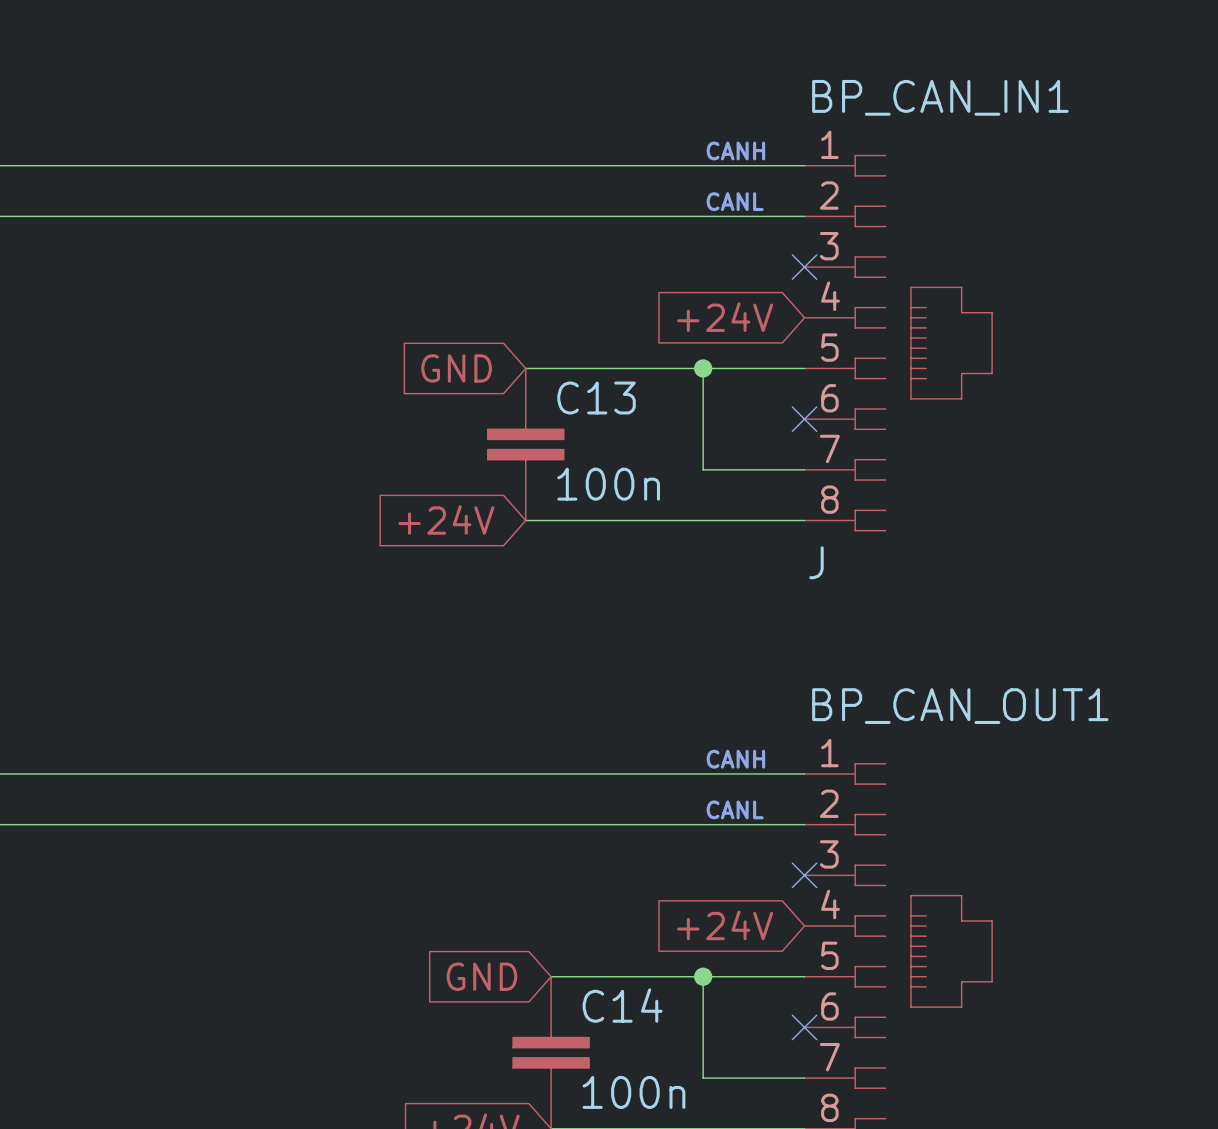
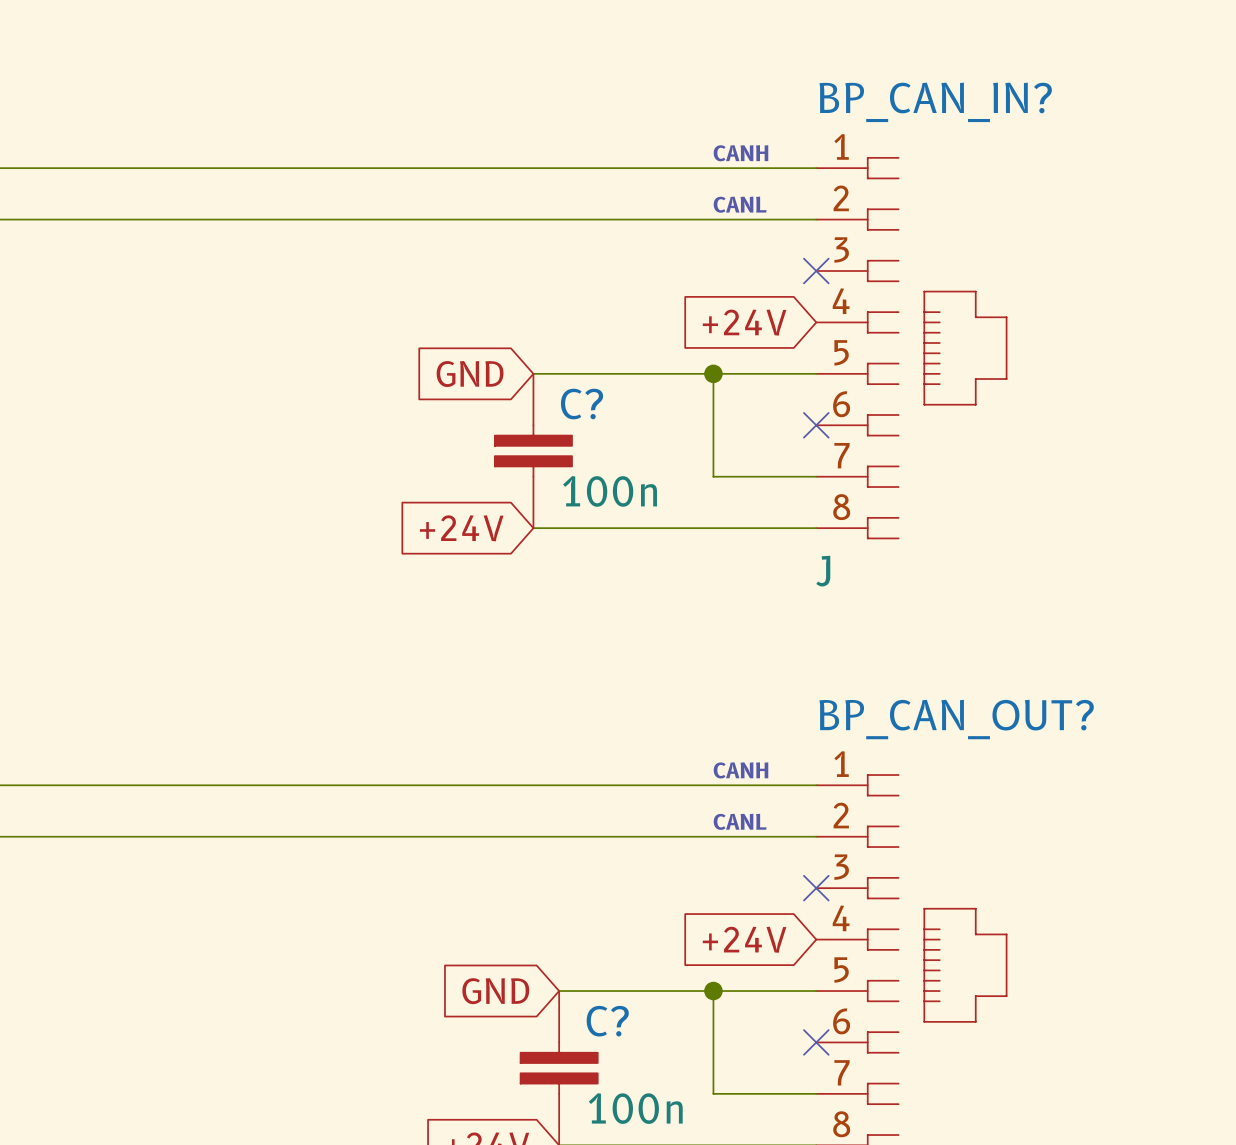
BP_CAN_IN1 name: BP_CAN_IN1 (940, 97) -> BP_CAN_IN? (935, 102)
C13 name: C13 (596, 398) -> C? (582, 404)
BP_CAN_OUT1 name: BP_CAN_OUT1 (960, 706) -> BP_CAN_OUT? (956, 719)
C14 name: C14 (622, 1005) -> C? (607, 1021)

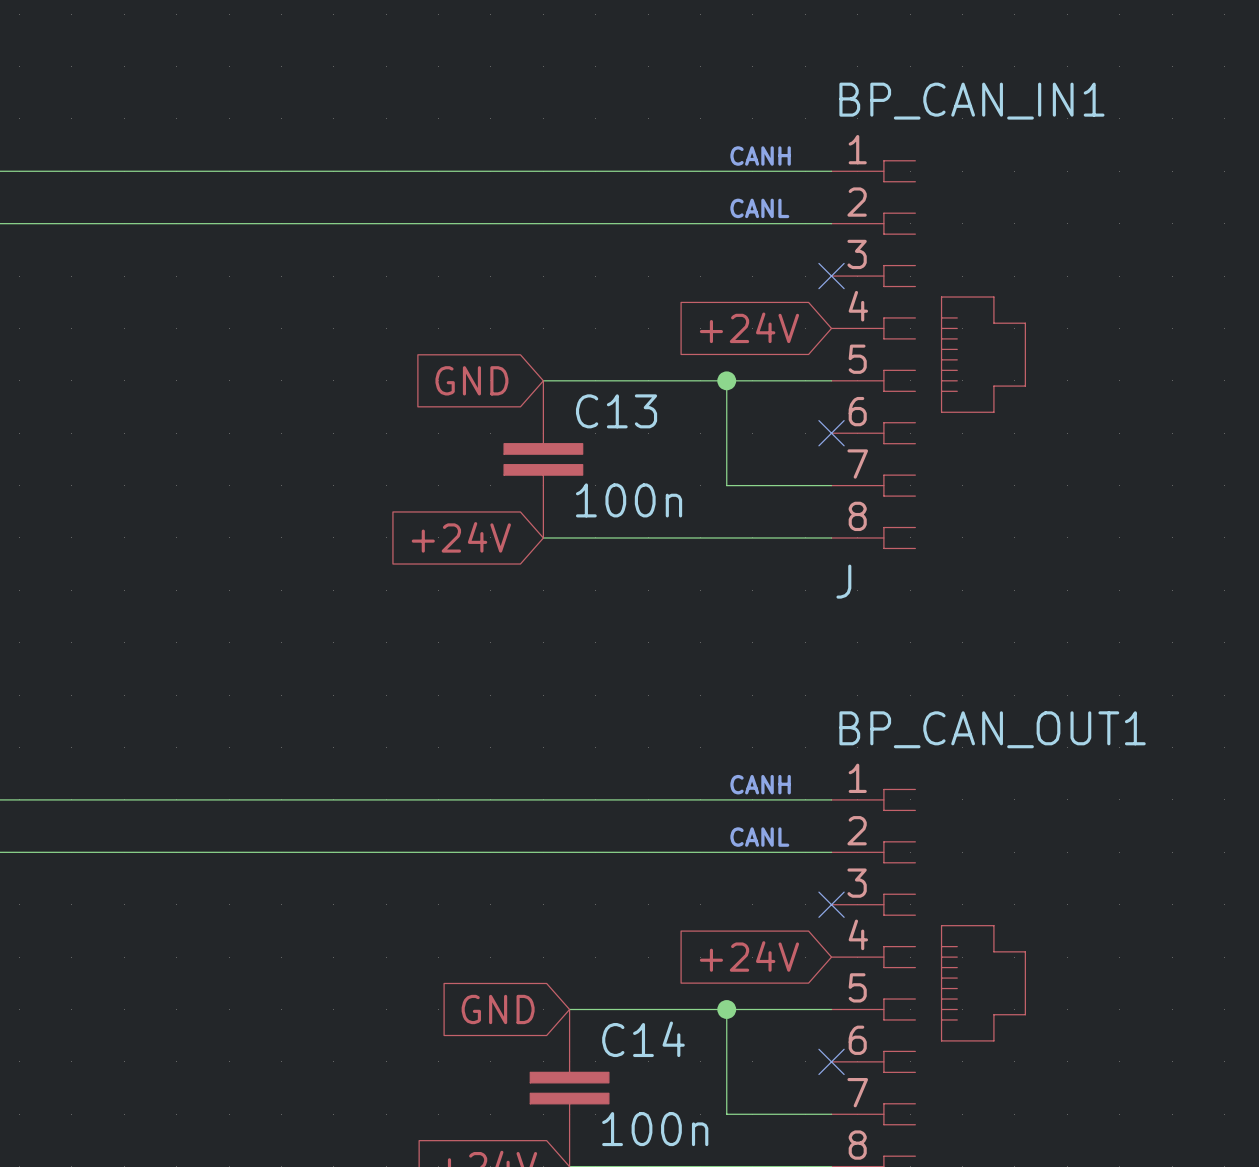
BP_CAN_IN? name: BP_CAN_IN? (935, 102) -> BP_CAN_IN1 (971, 101)
C? name: C? (582, 404) -> C13 (616, 411)
BP_CAN_OUT? name: BP_CAN_OUT? (956, 719) -> BP_CAN_OUT1 (992, 729)
C? name: C? (607, 1021) -> C14 (643, 1039)

